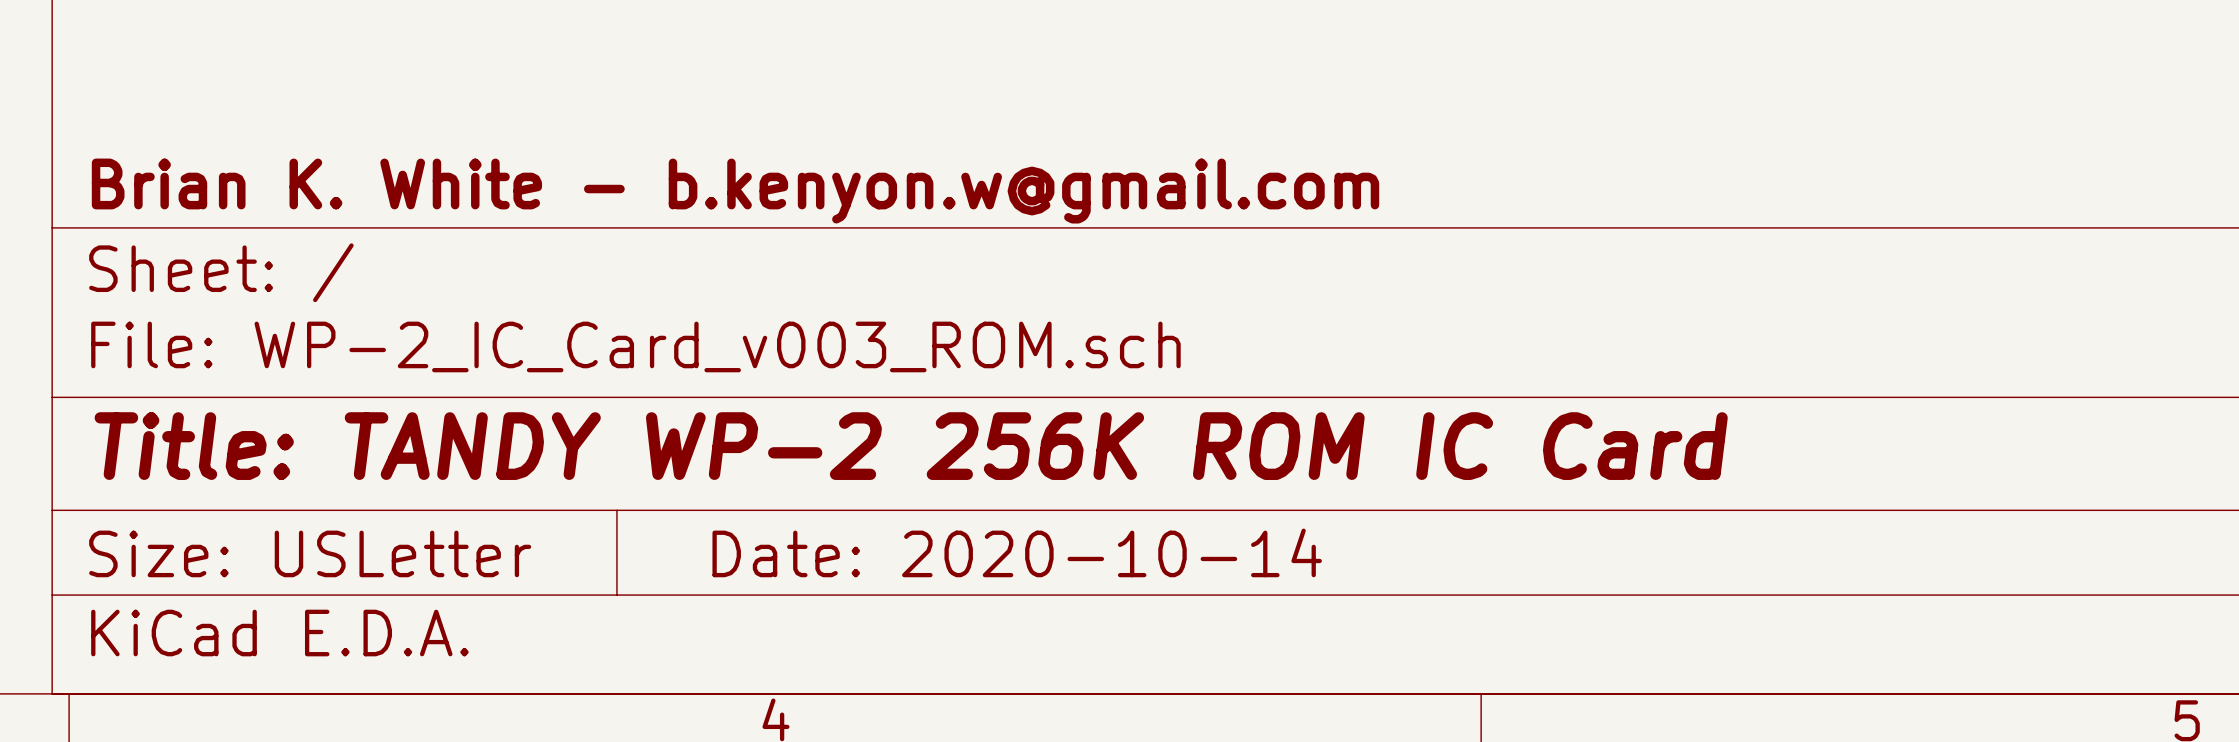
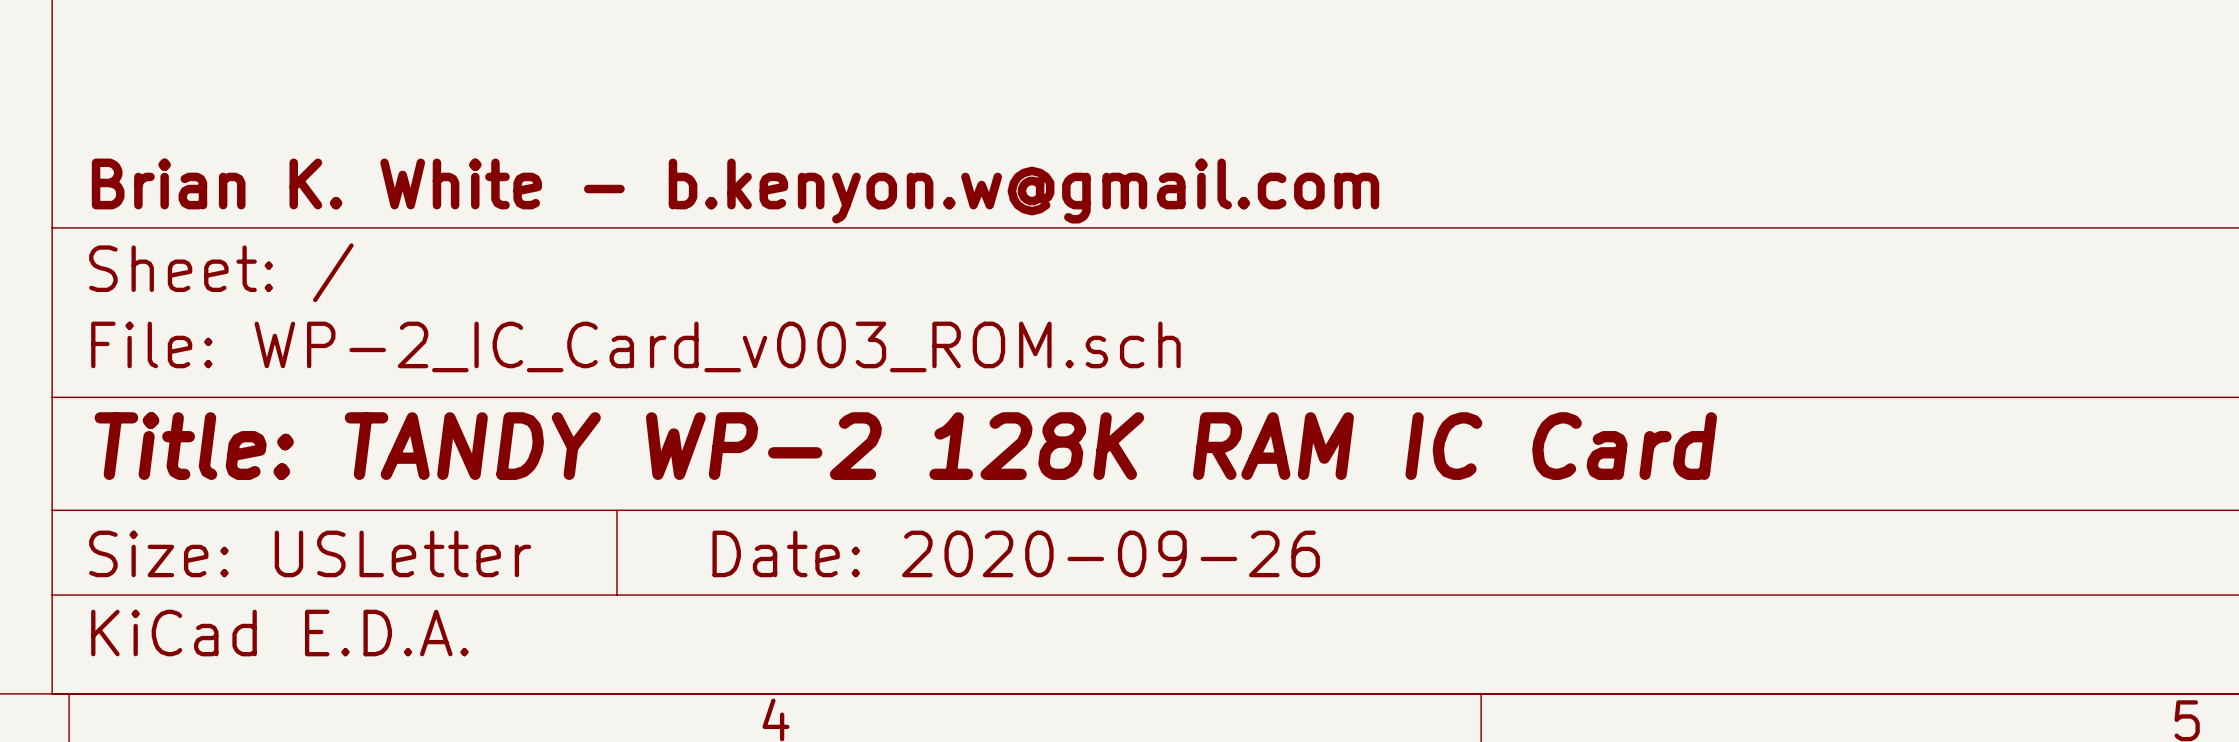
title block: Title: TANDY WP-2 256K ROM IC Card (911, 446) -> Title: TANDY WP-2 128K RAM IC Card (905, 446)
title block: Date: 2020-10-14 (1017, 552) -> Date: 2020-09-26 (1016, 553)

